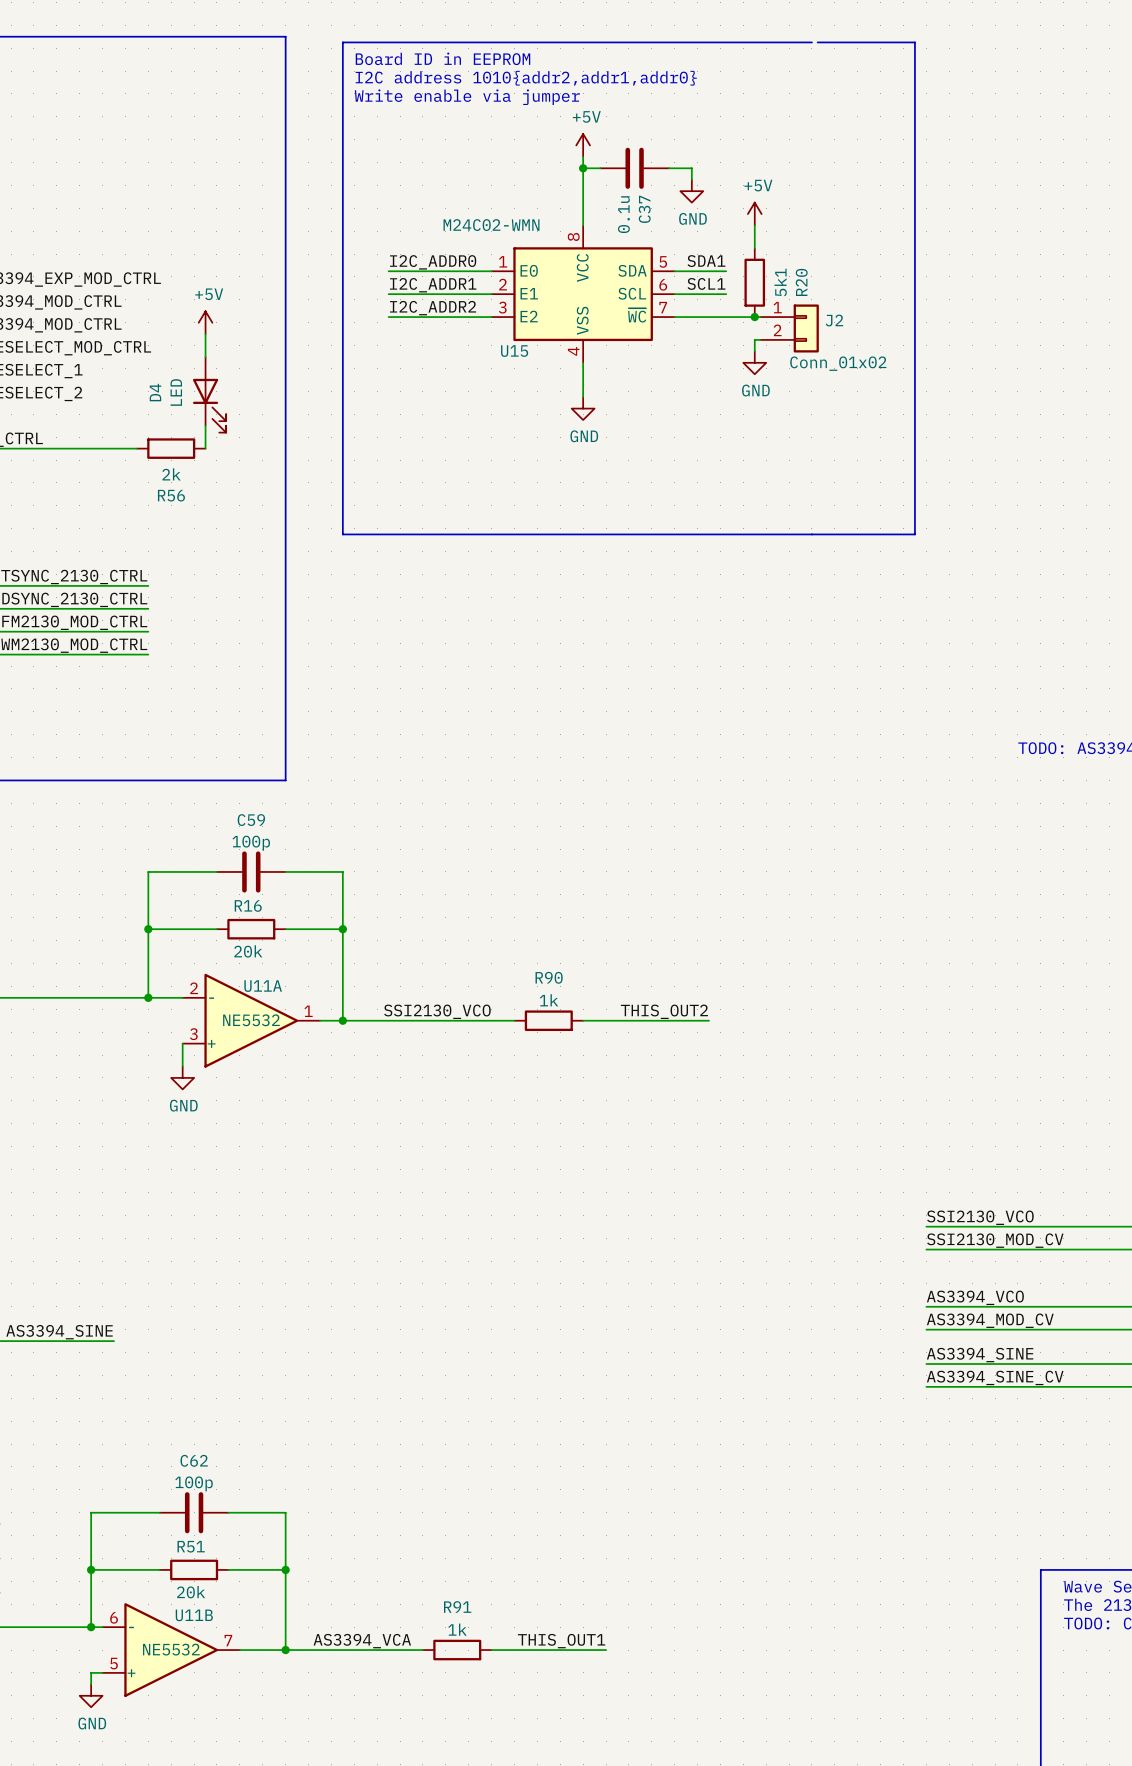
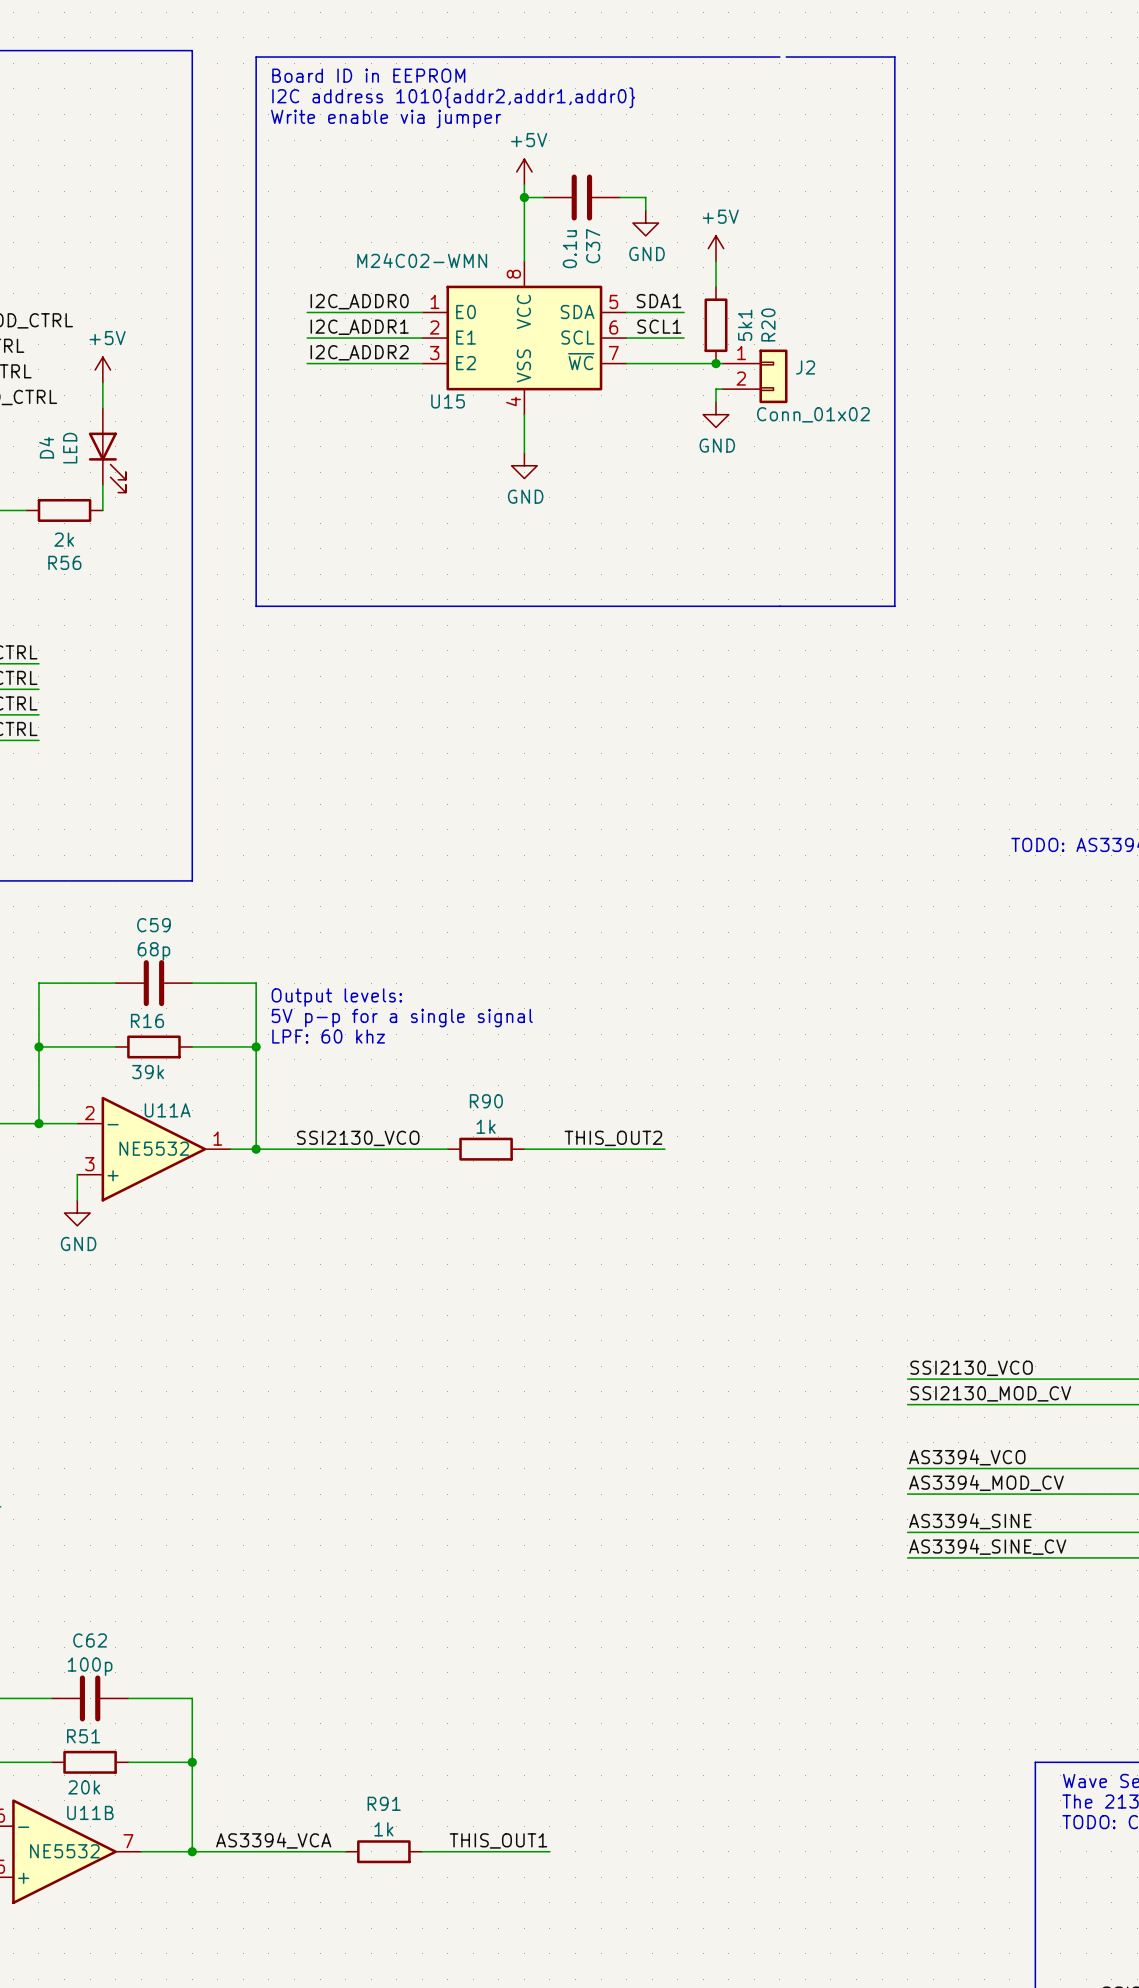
C59 value: 100p (251, 843) -> 68p (153, 951)
text: none -> Output levels: (336, 997)
text: none -> 5V p-p for a single signal (402, 1018)
text: none -> LPF: 60 khz (328, 1036)
R16 value: 20k (248, 951) -> 39k (148, 1072)

